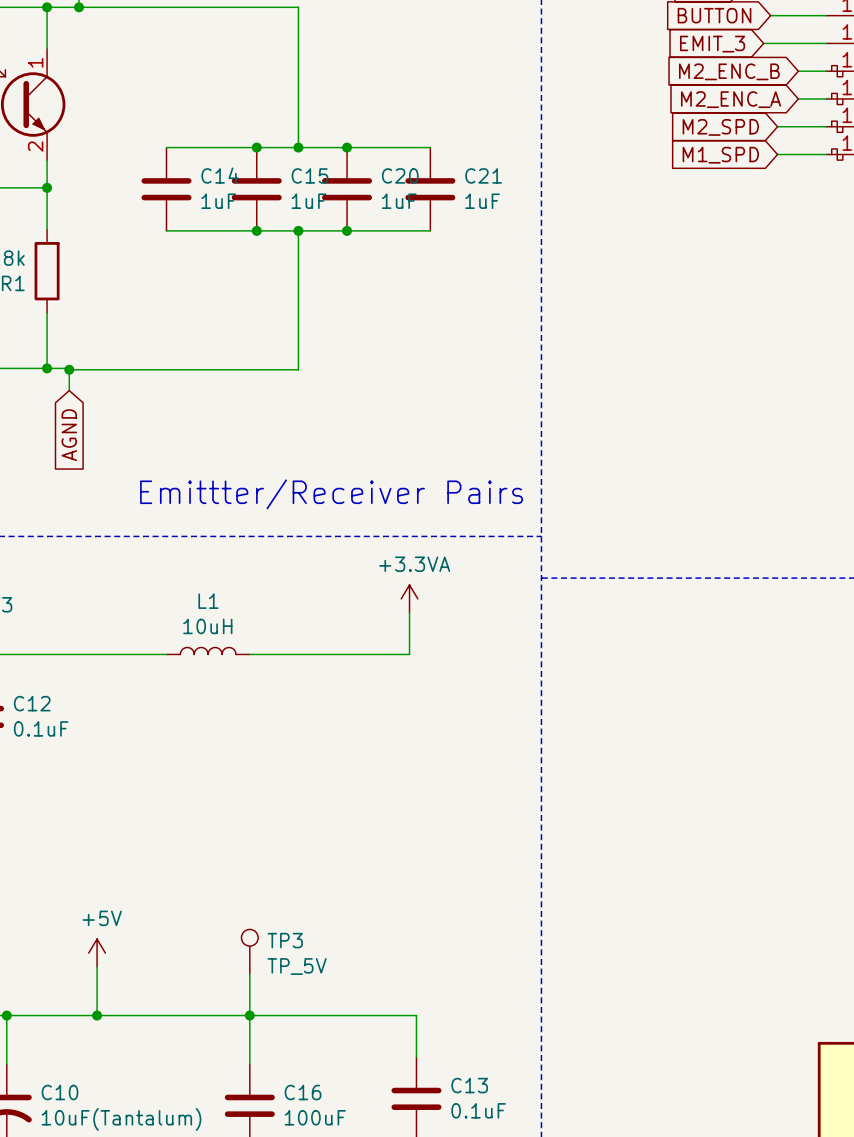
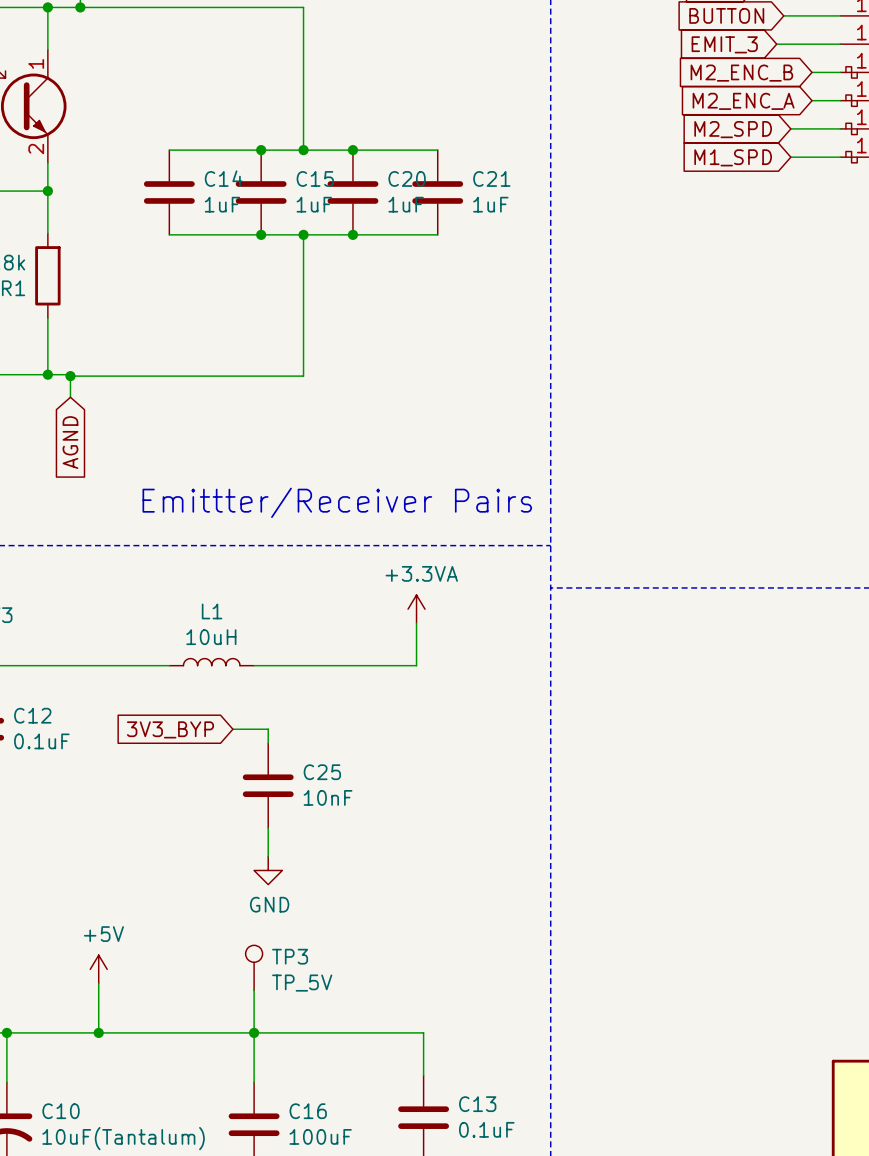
wire: none -> (232, 729) (268, 729) (268, 743)
global label: none -> 3V3_BYP (170, 729)
C25: none -> 10nF (268, 785)
wire: none -> (268, 828) (268, 856)
power symbol: none -> GND (268, 870)

